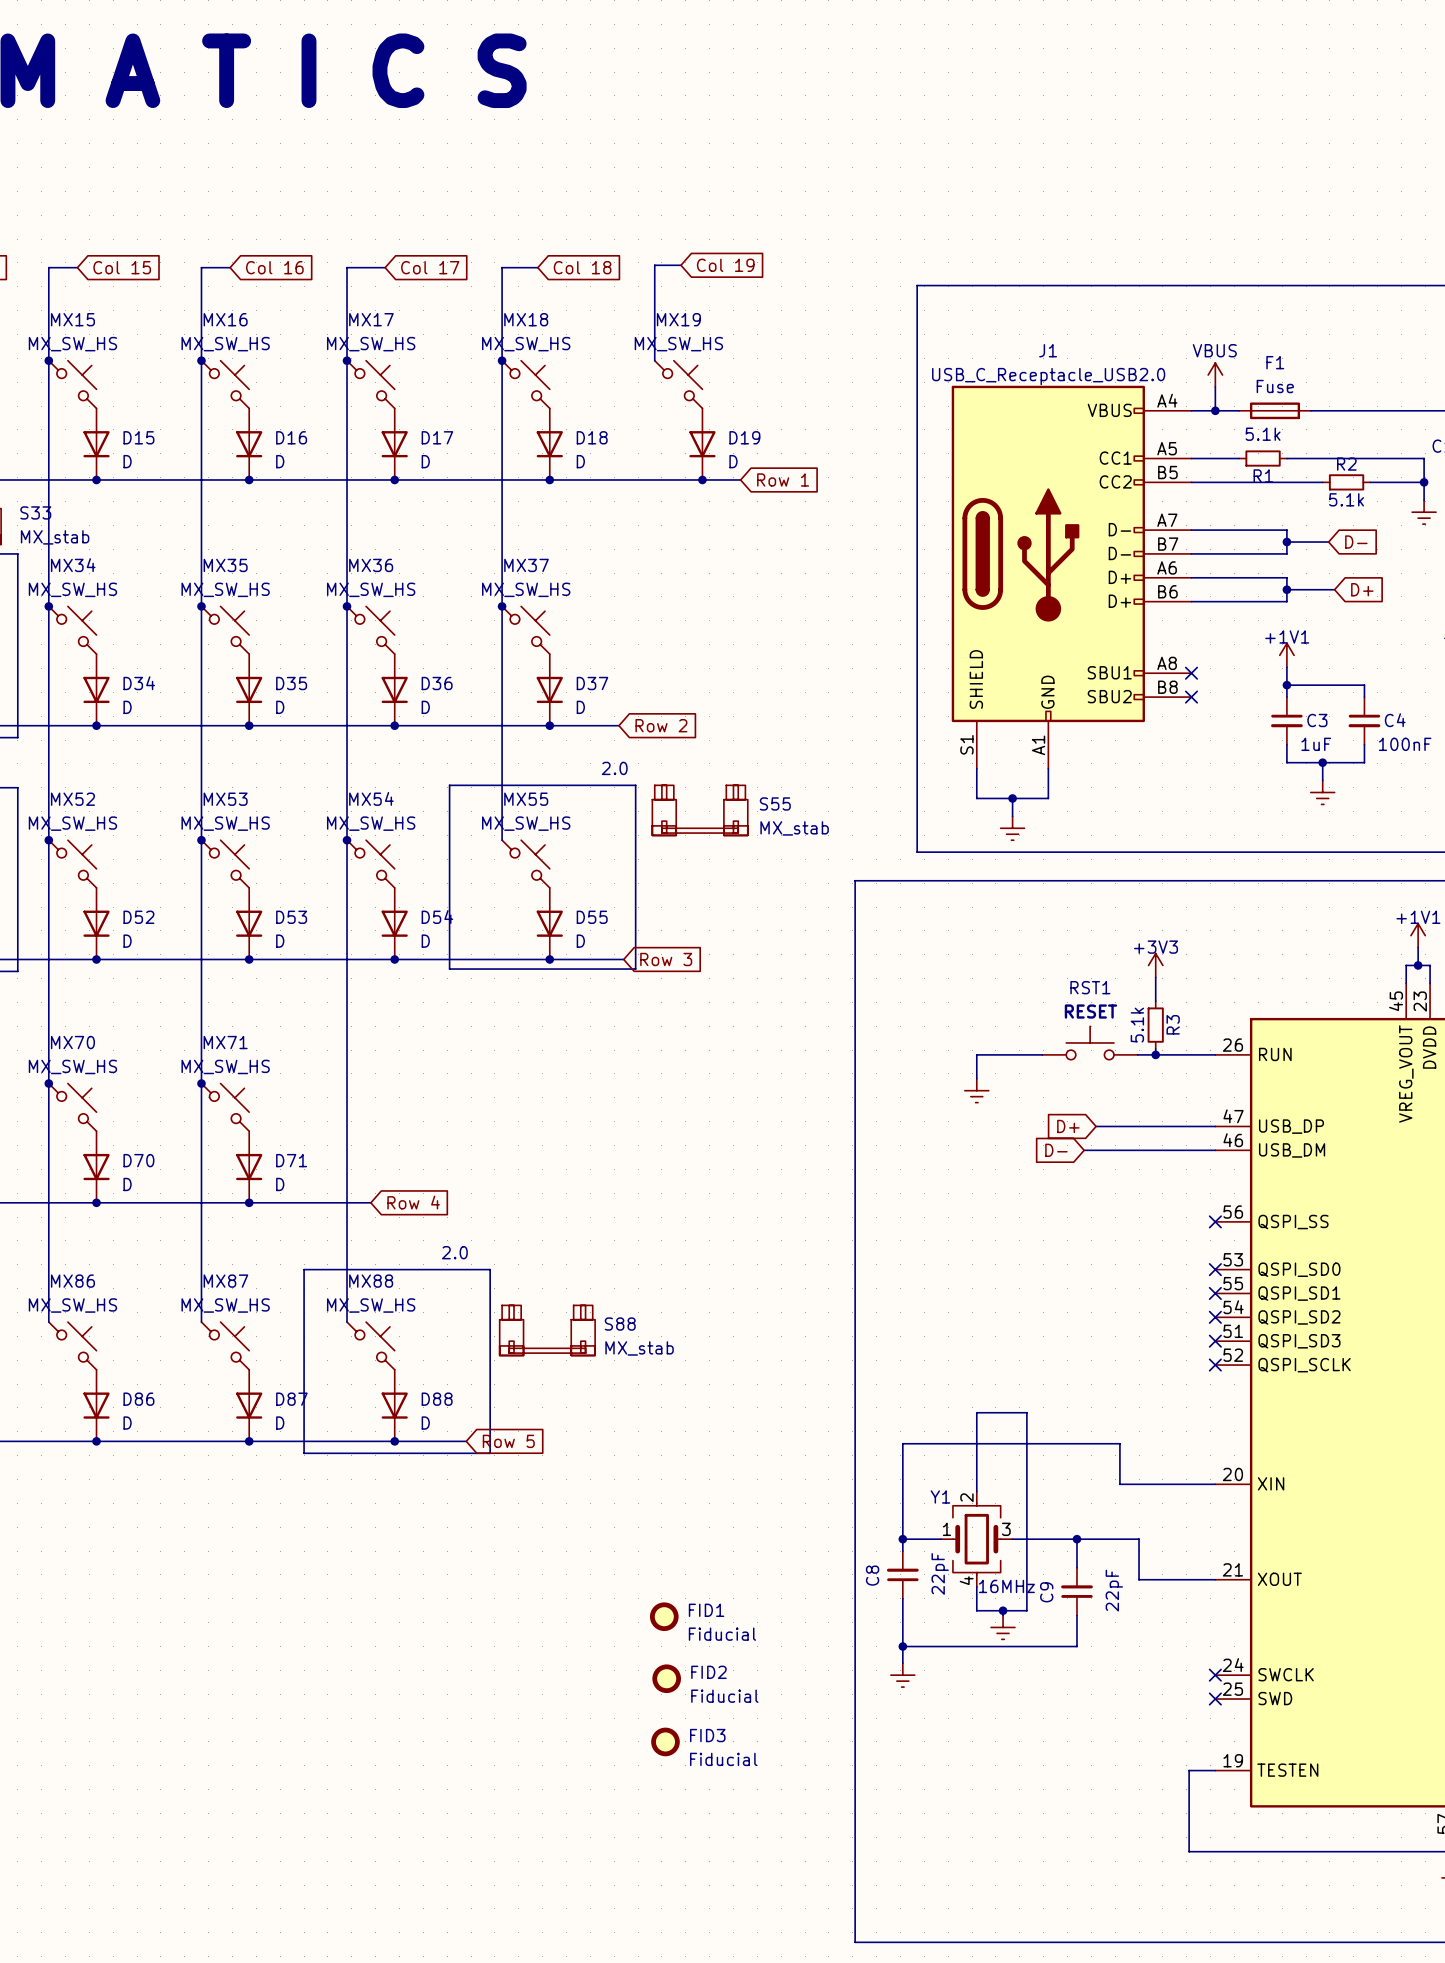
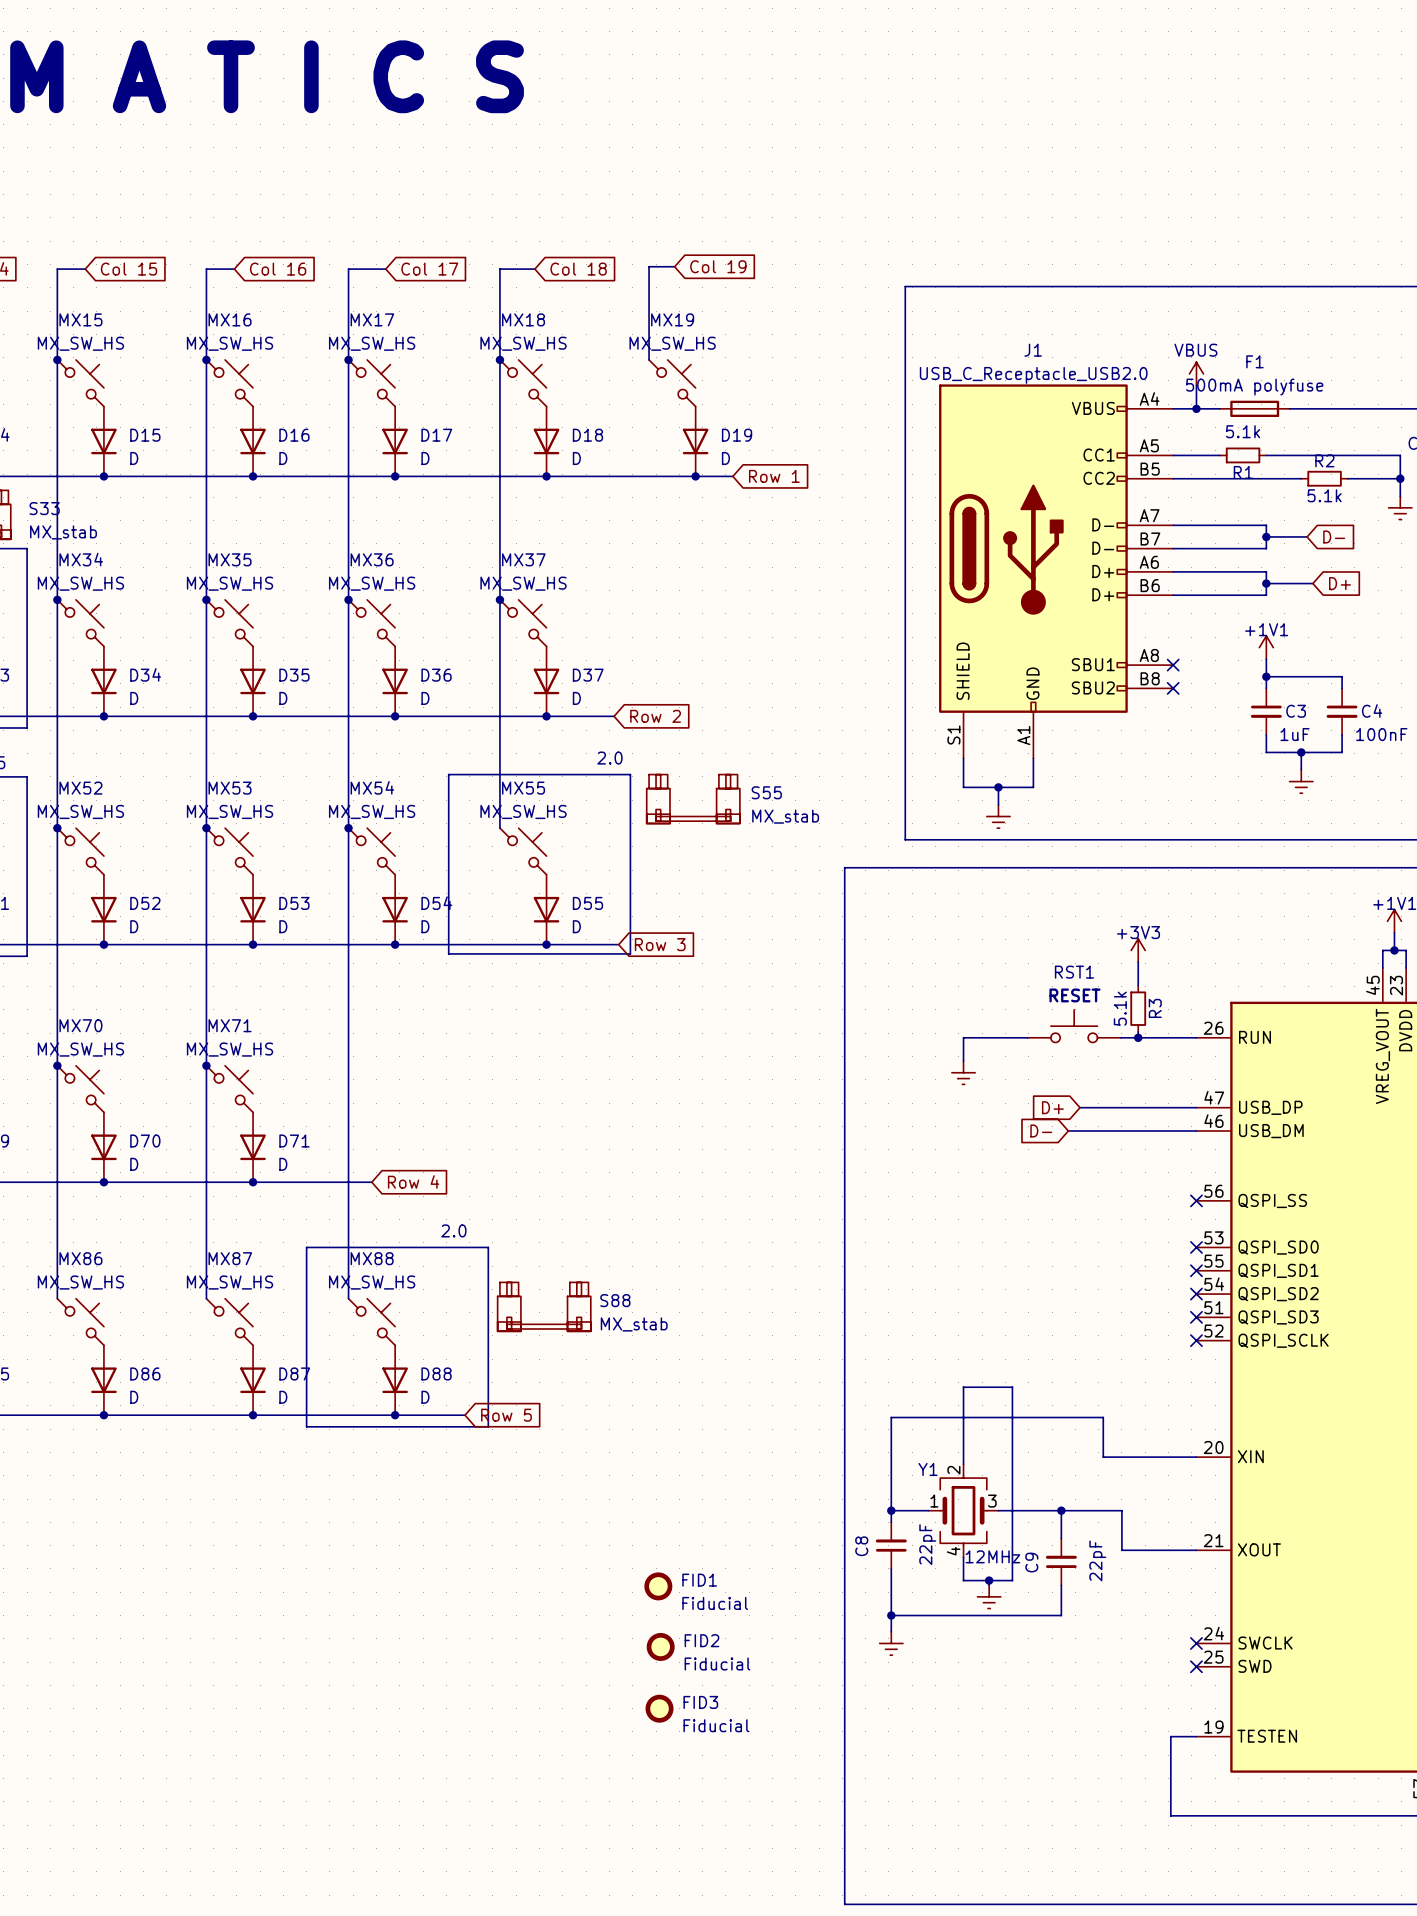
F1 value: Fuse (1275, 386) -> 500mA polyfuse (1254, 387)
Y1 value: 16MHz (1006, 1586) -> 12MHz (992, 1556)

